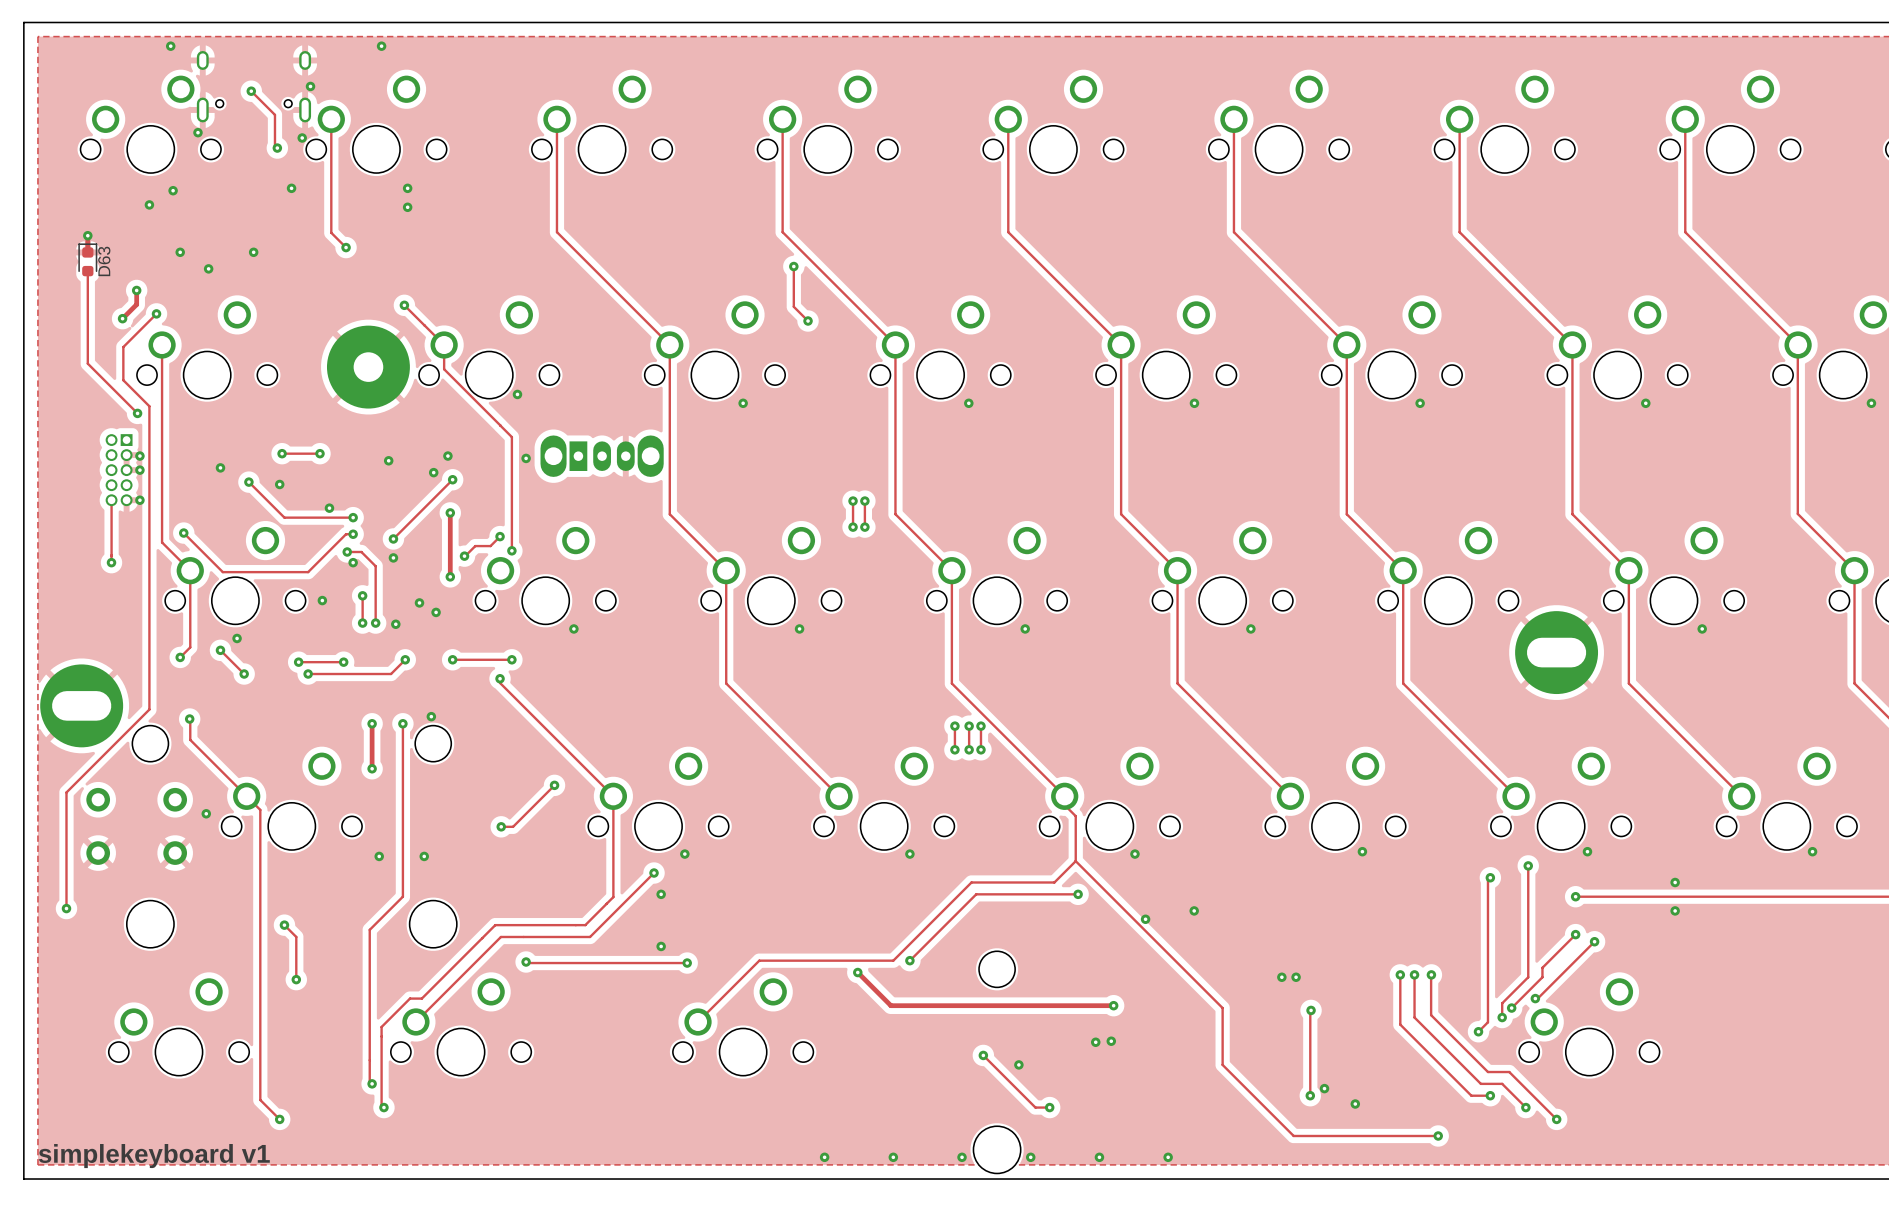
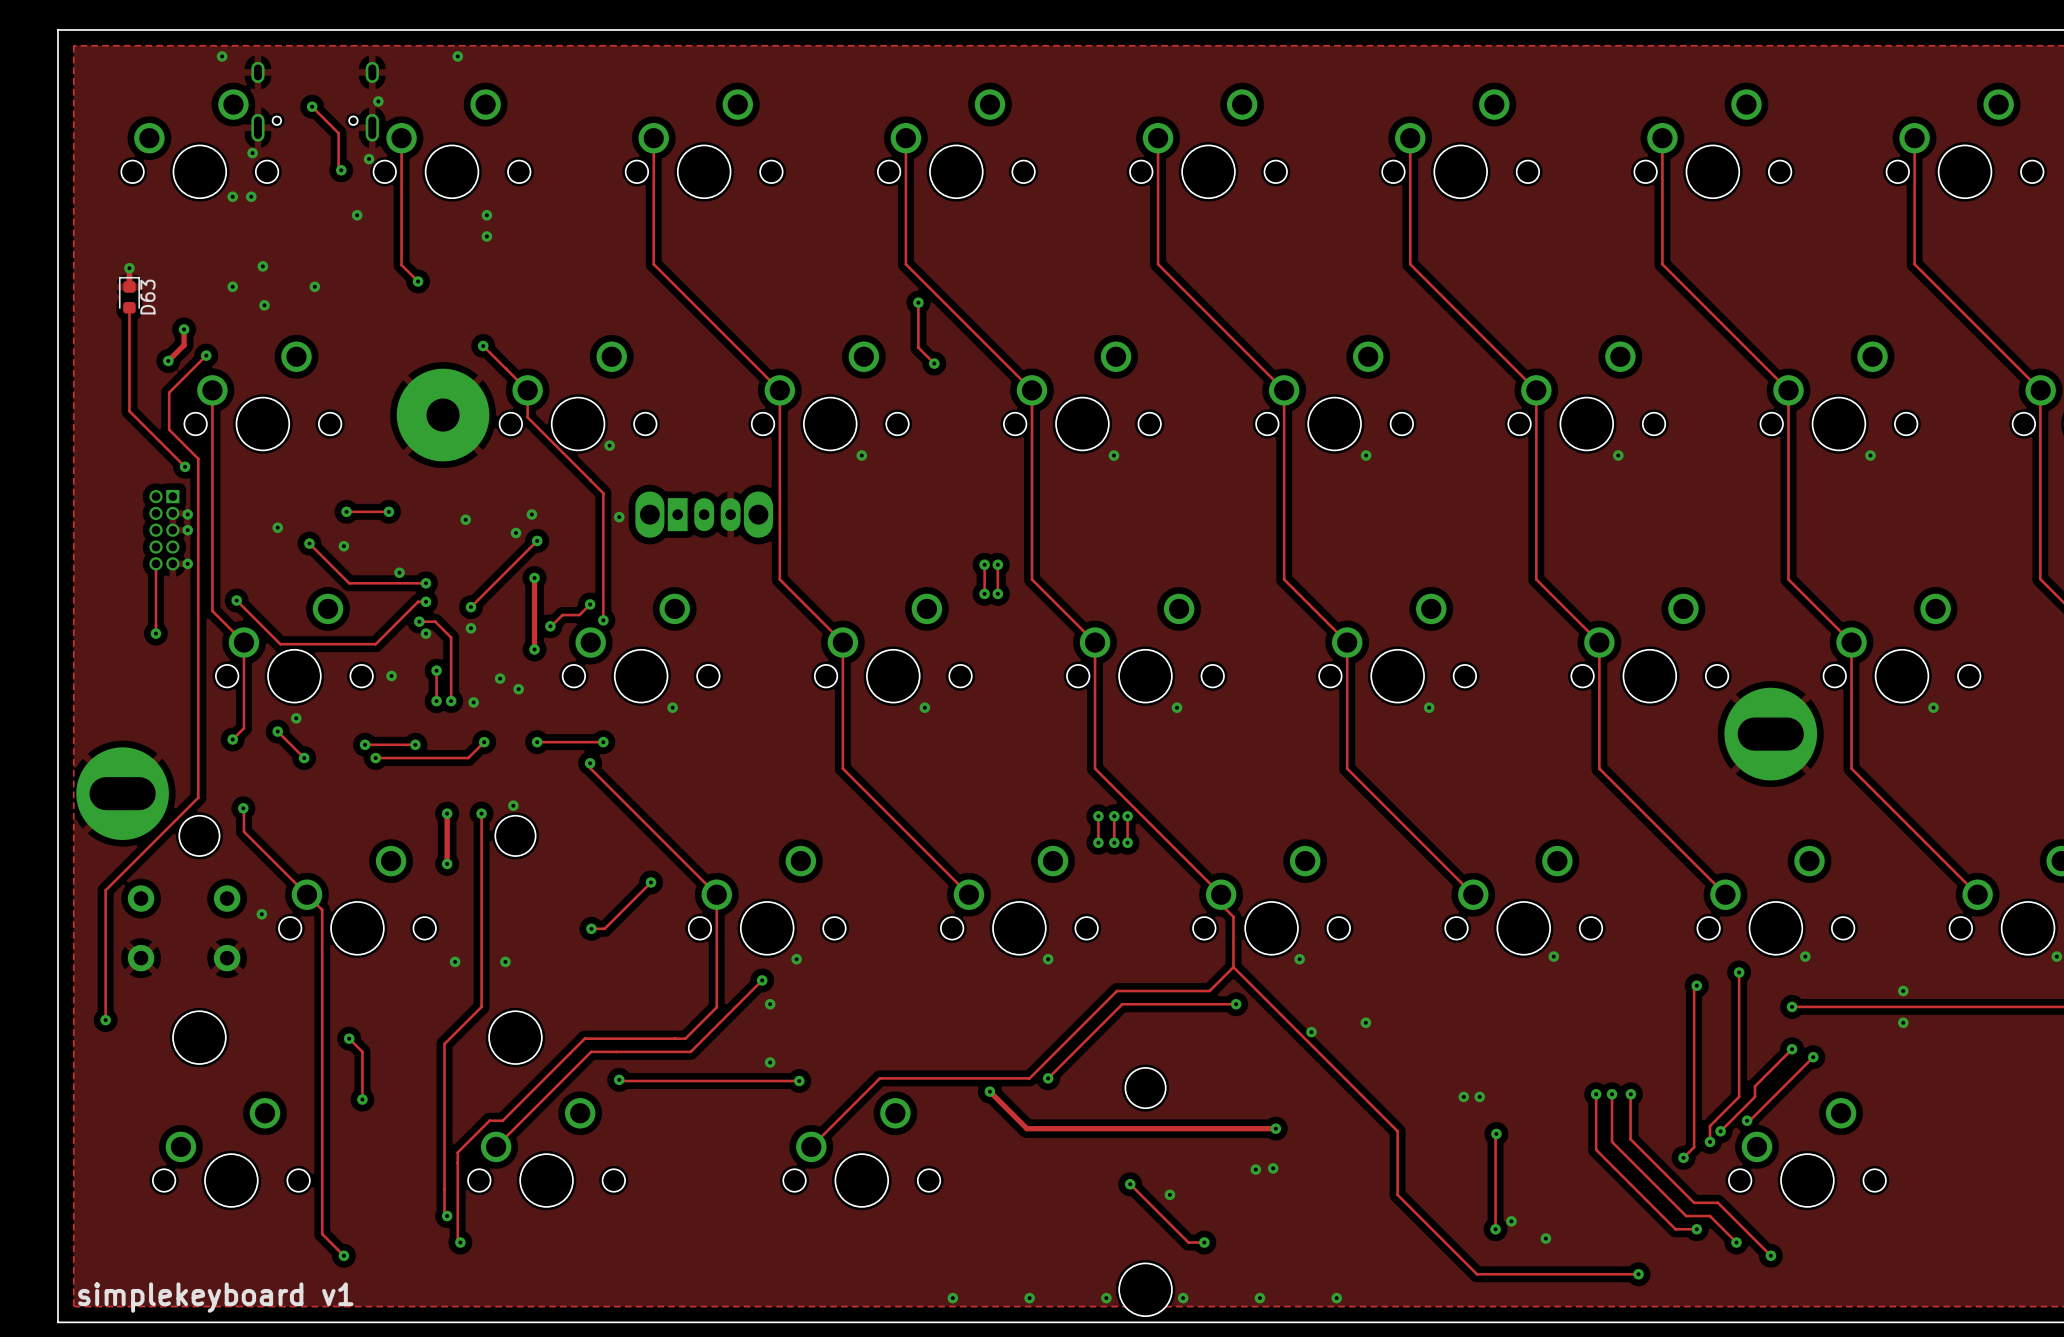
via: none -> (232, 196)
via: none -> (251, 196)
via: (173, 190) -> none
via: (149, 204) -> none
via: none -> (262, 266)

